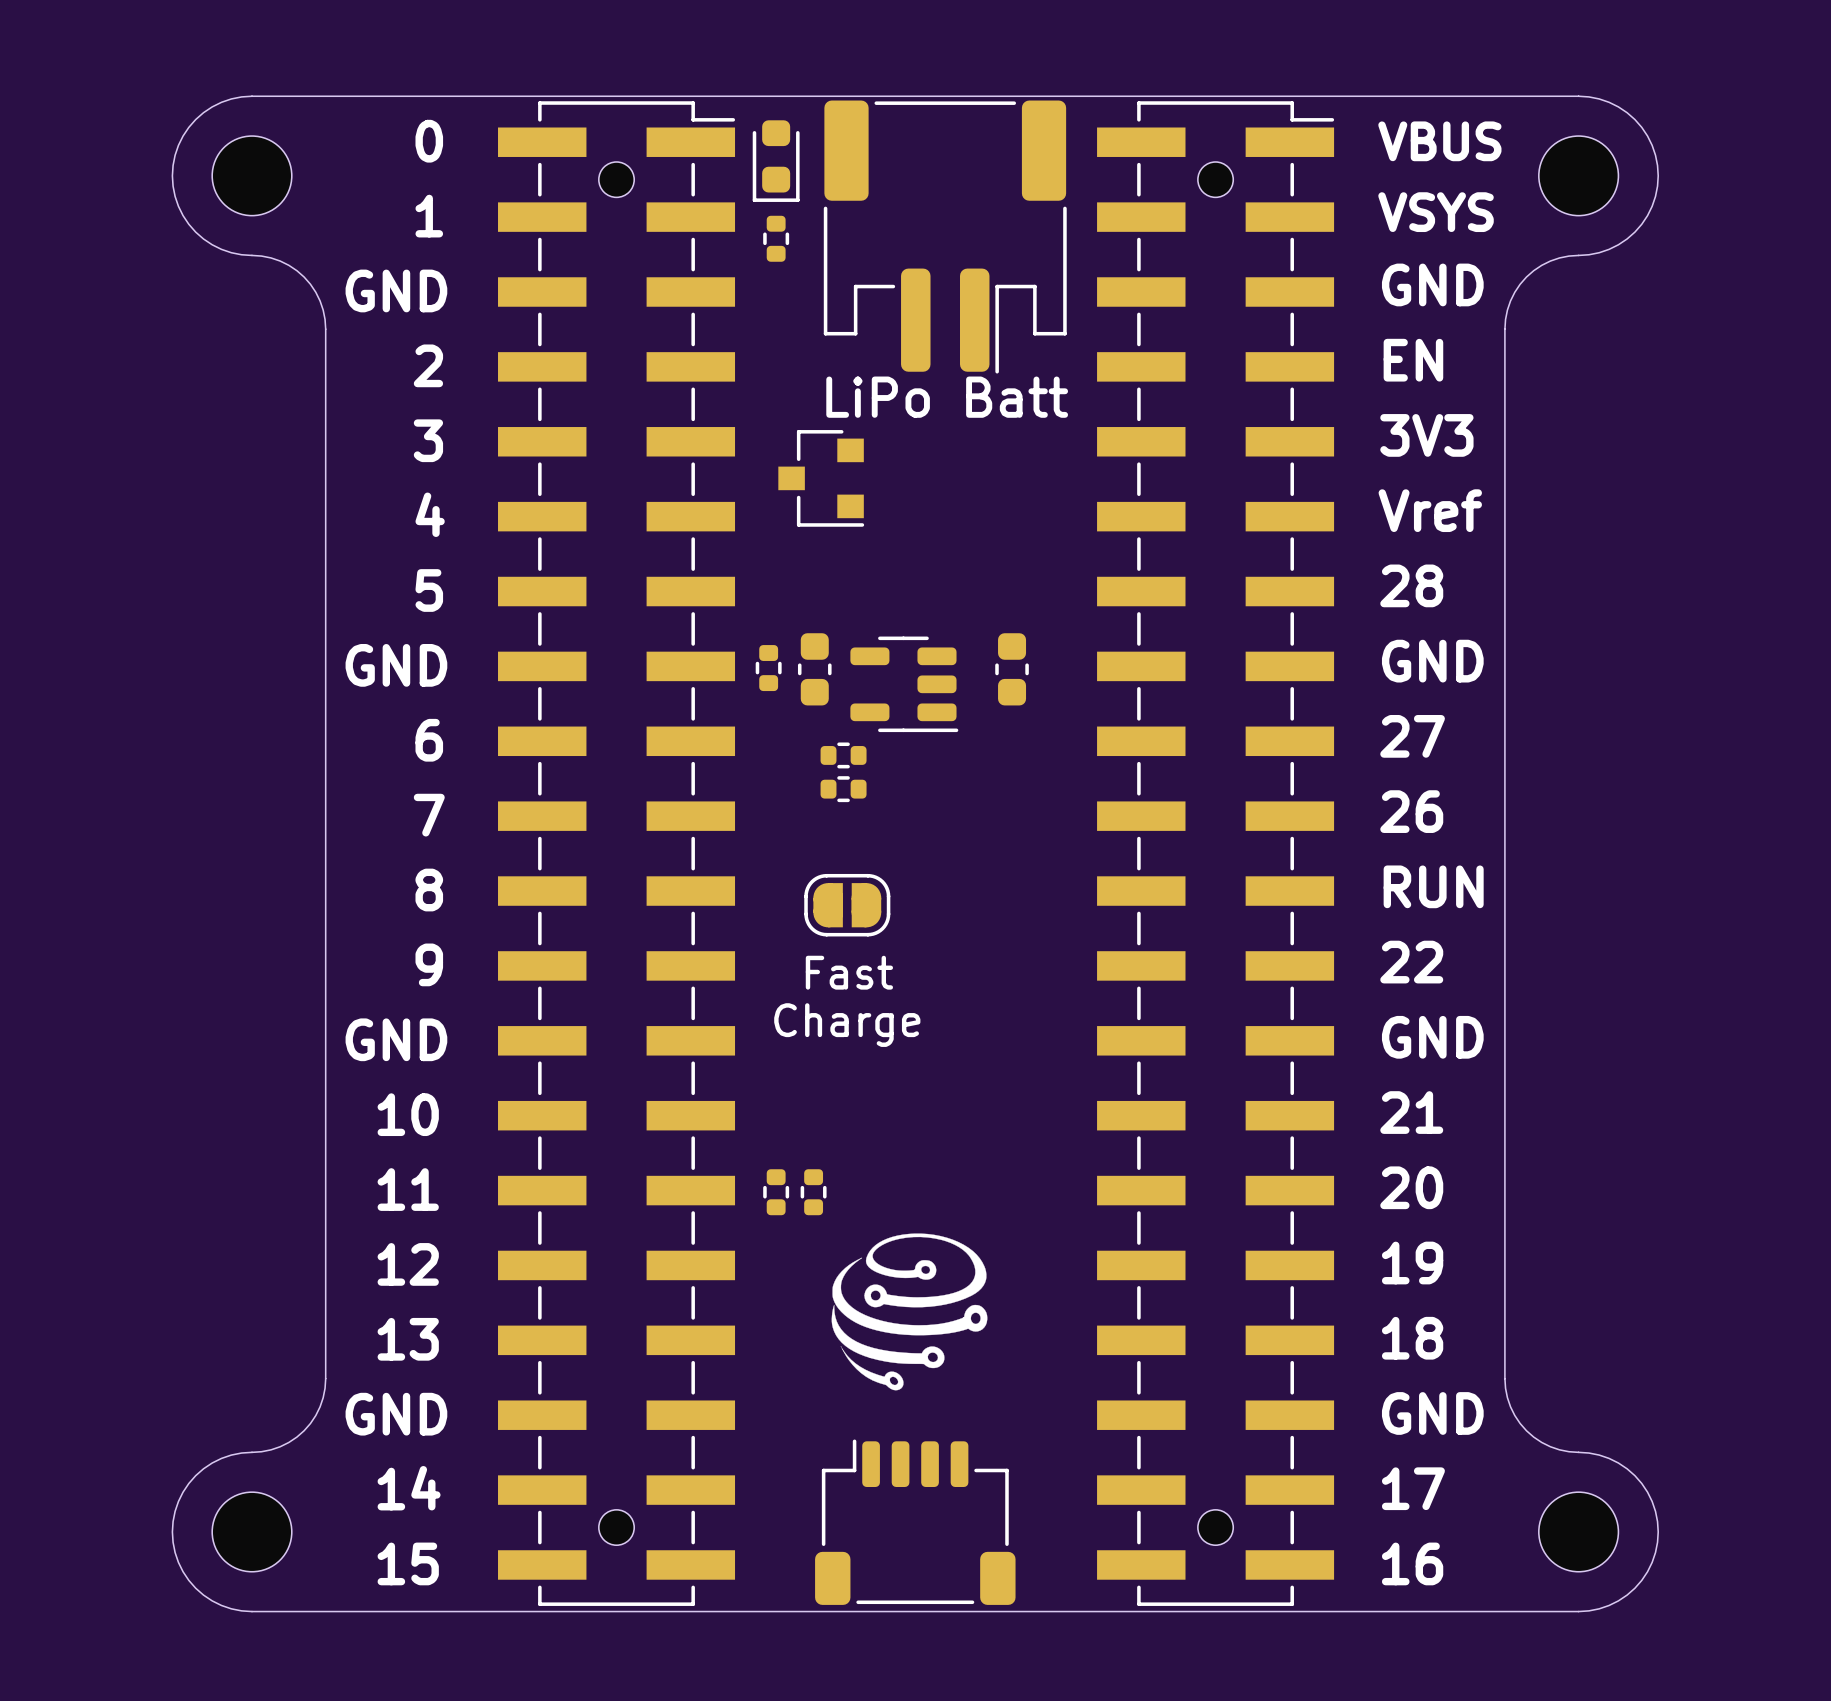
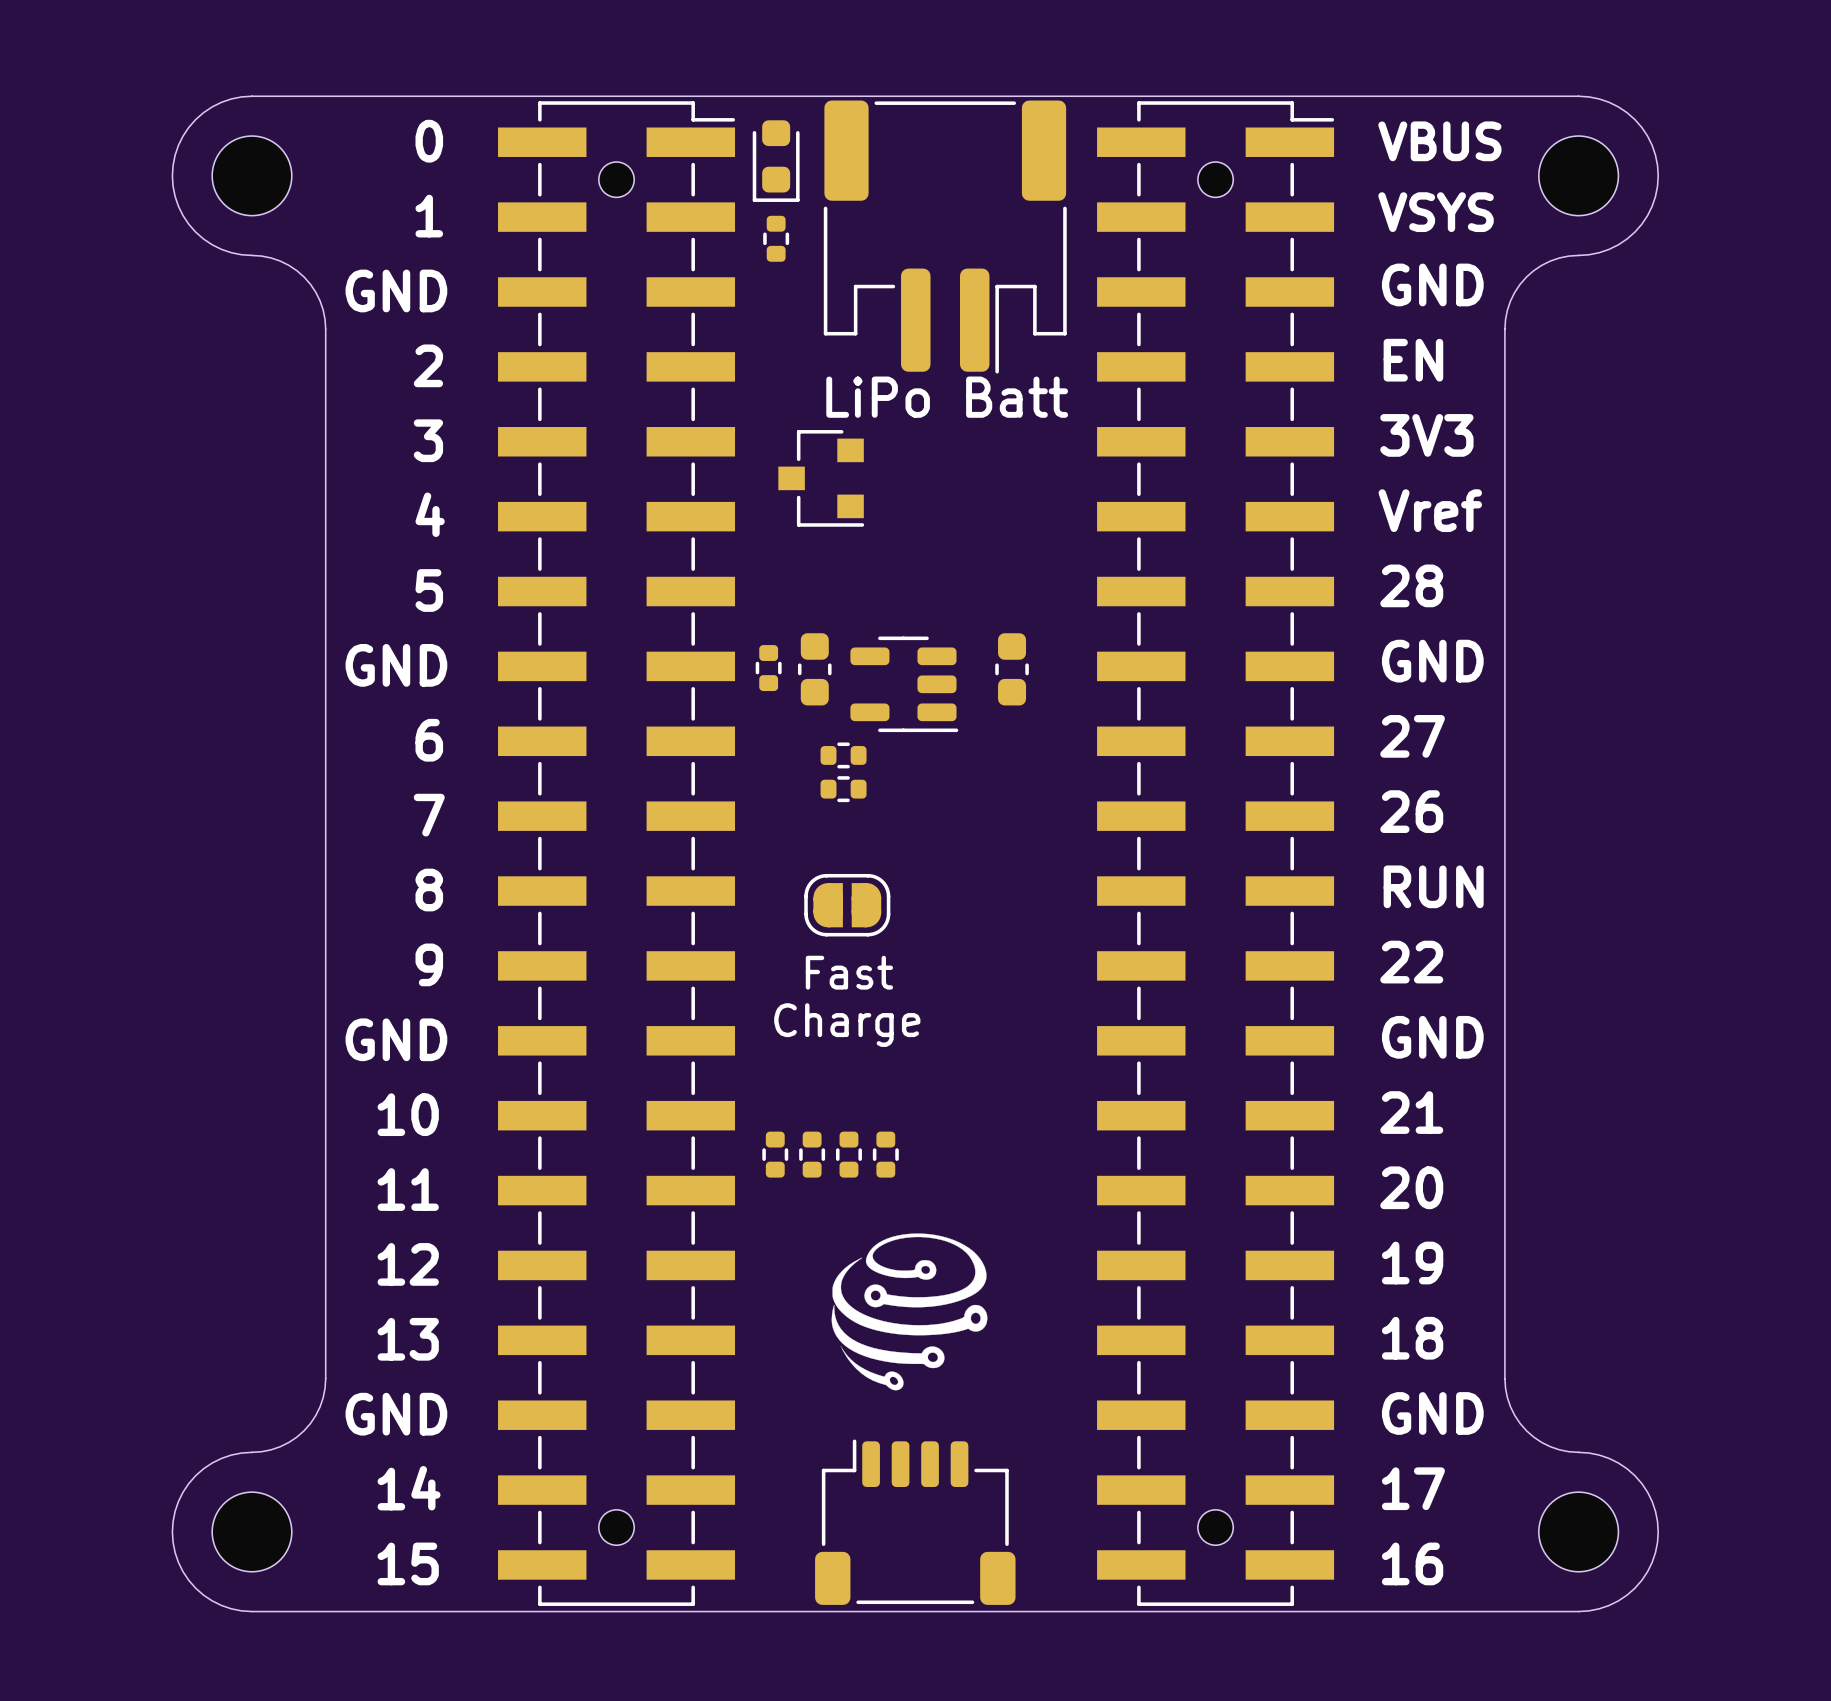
part: none -> (775, 1154)
part: none -> (812, 1154)
part: none -> (848, 1154)
part: none -> (885, 1154)
part: (776, 1192) -> none
part: (813, 1192) -> none

